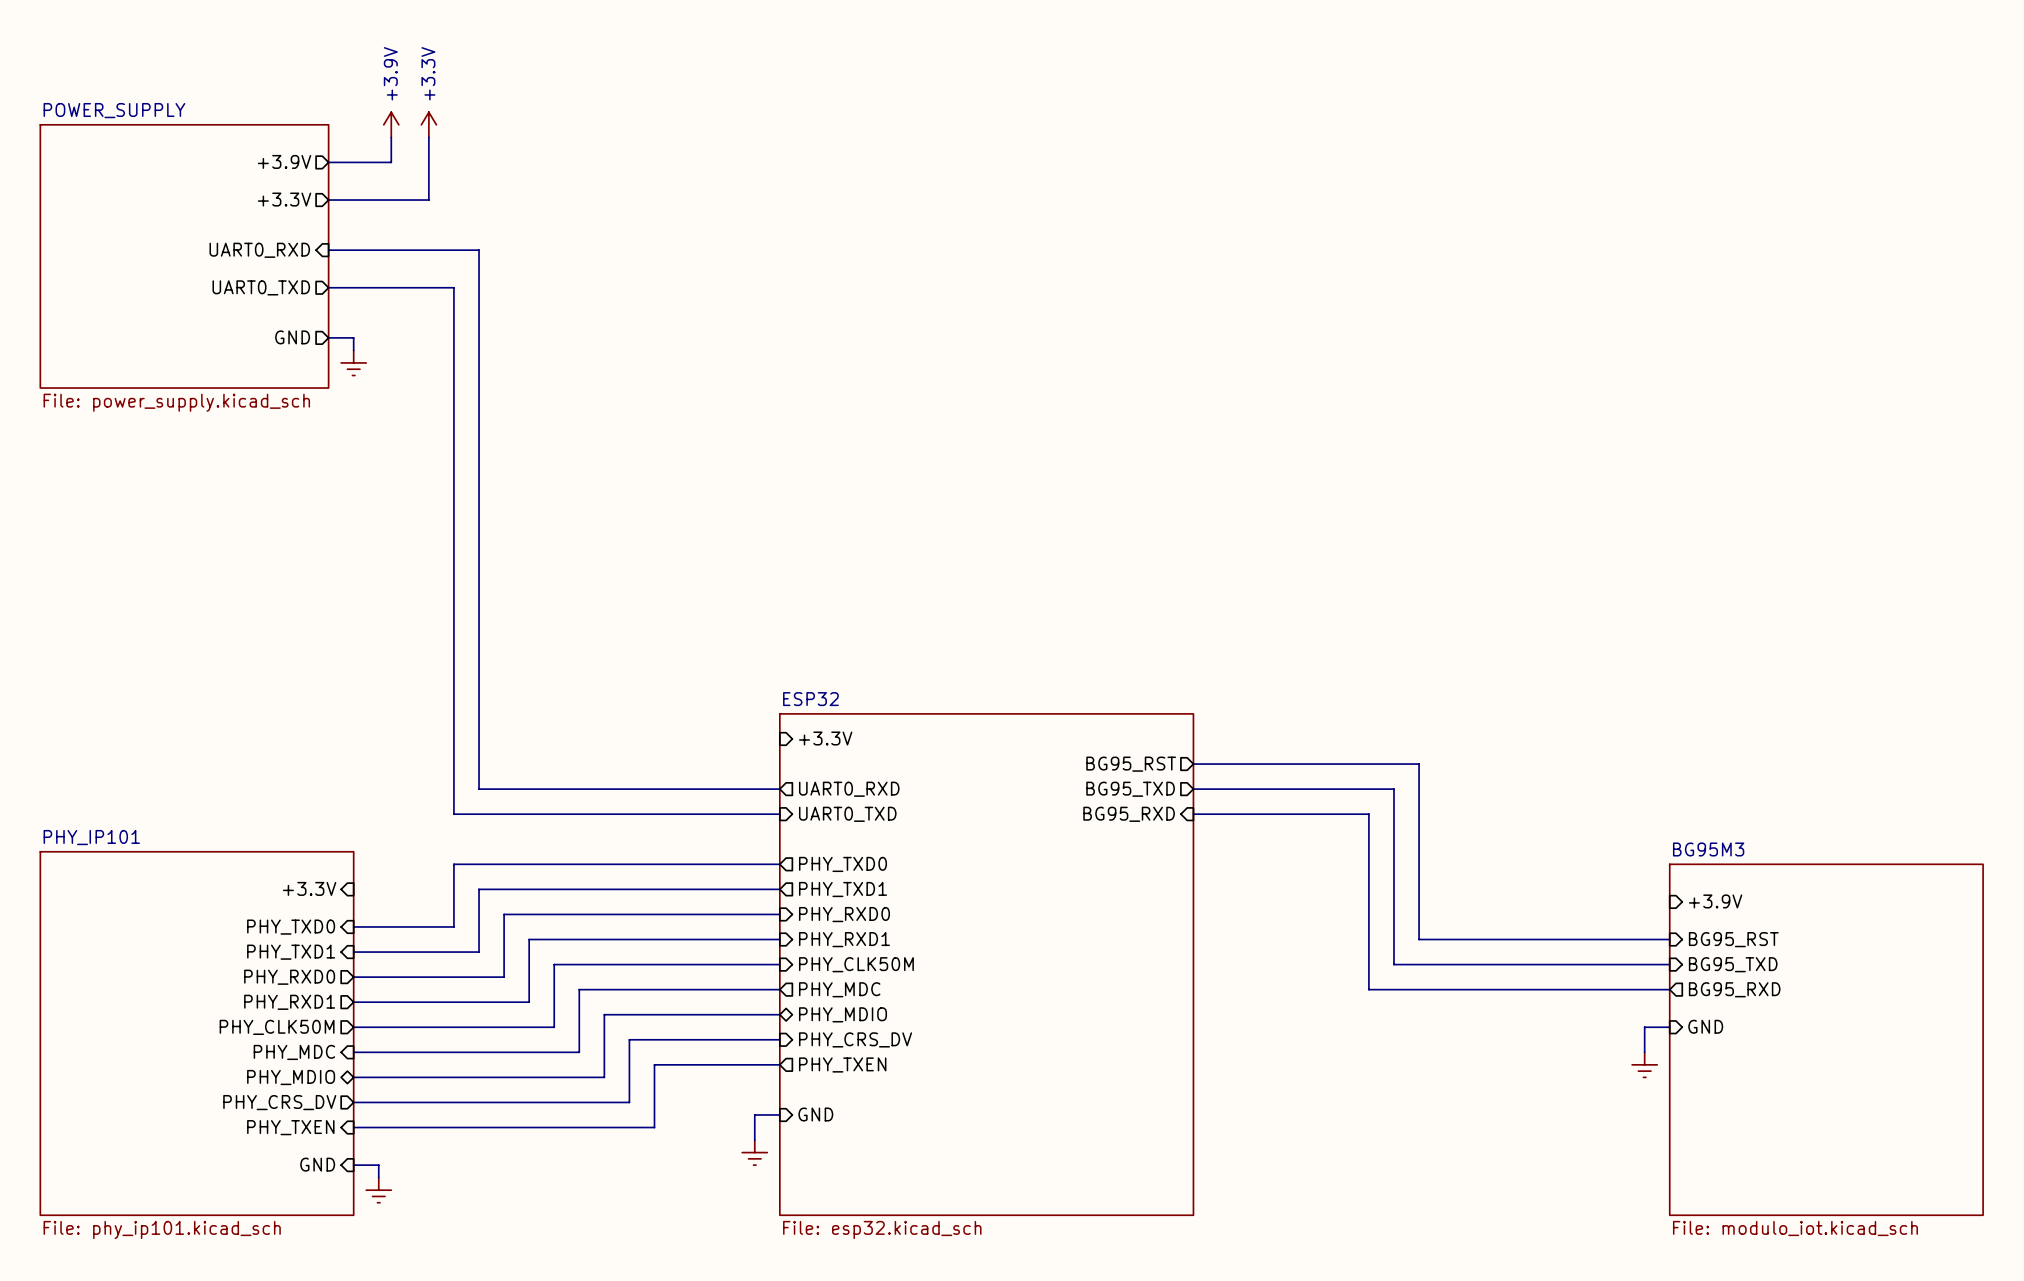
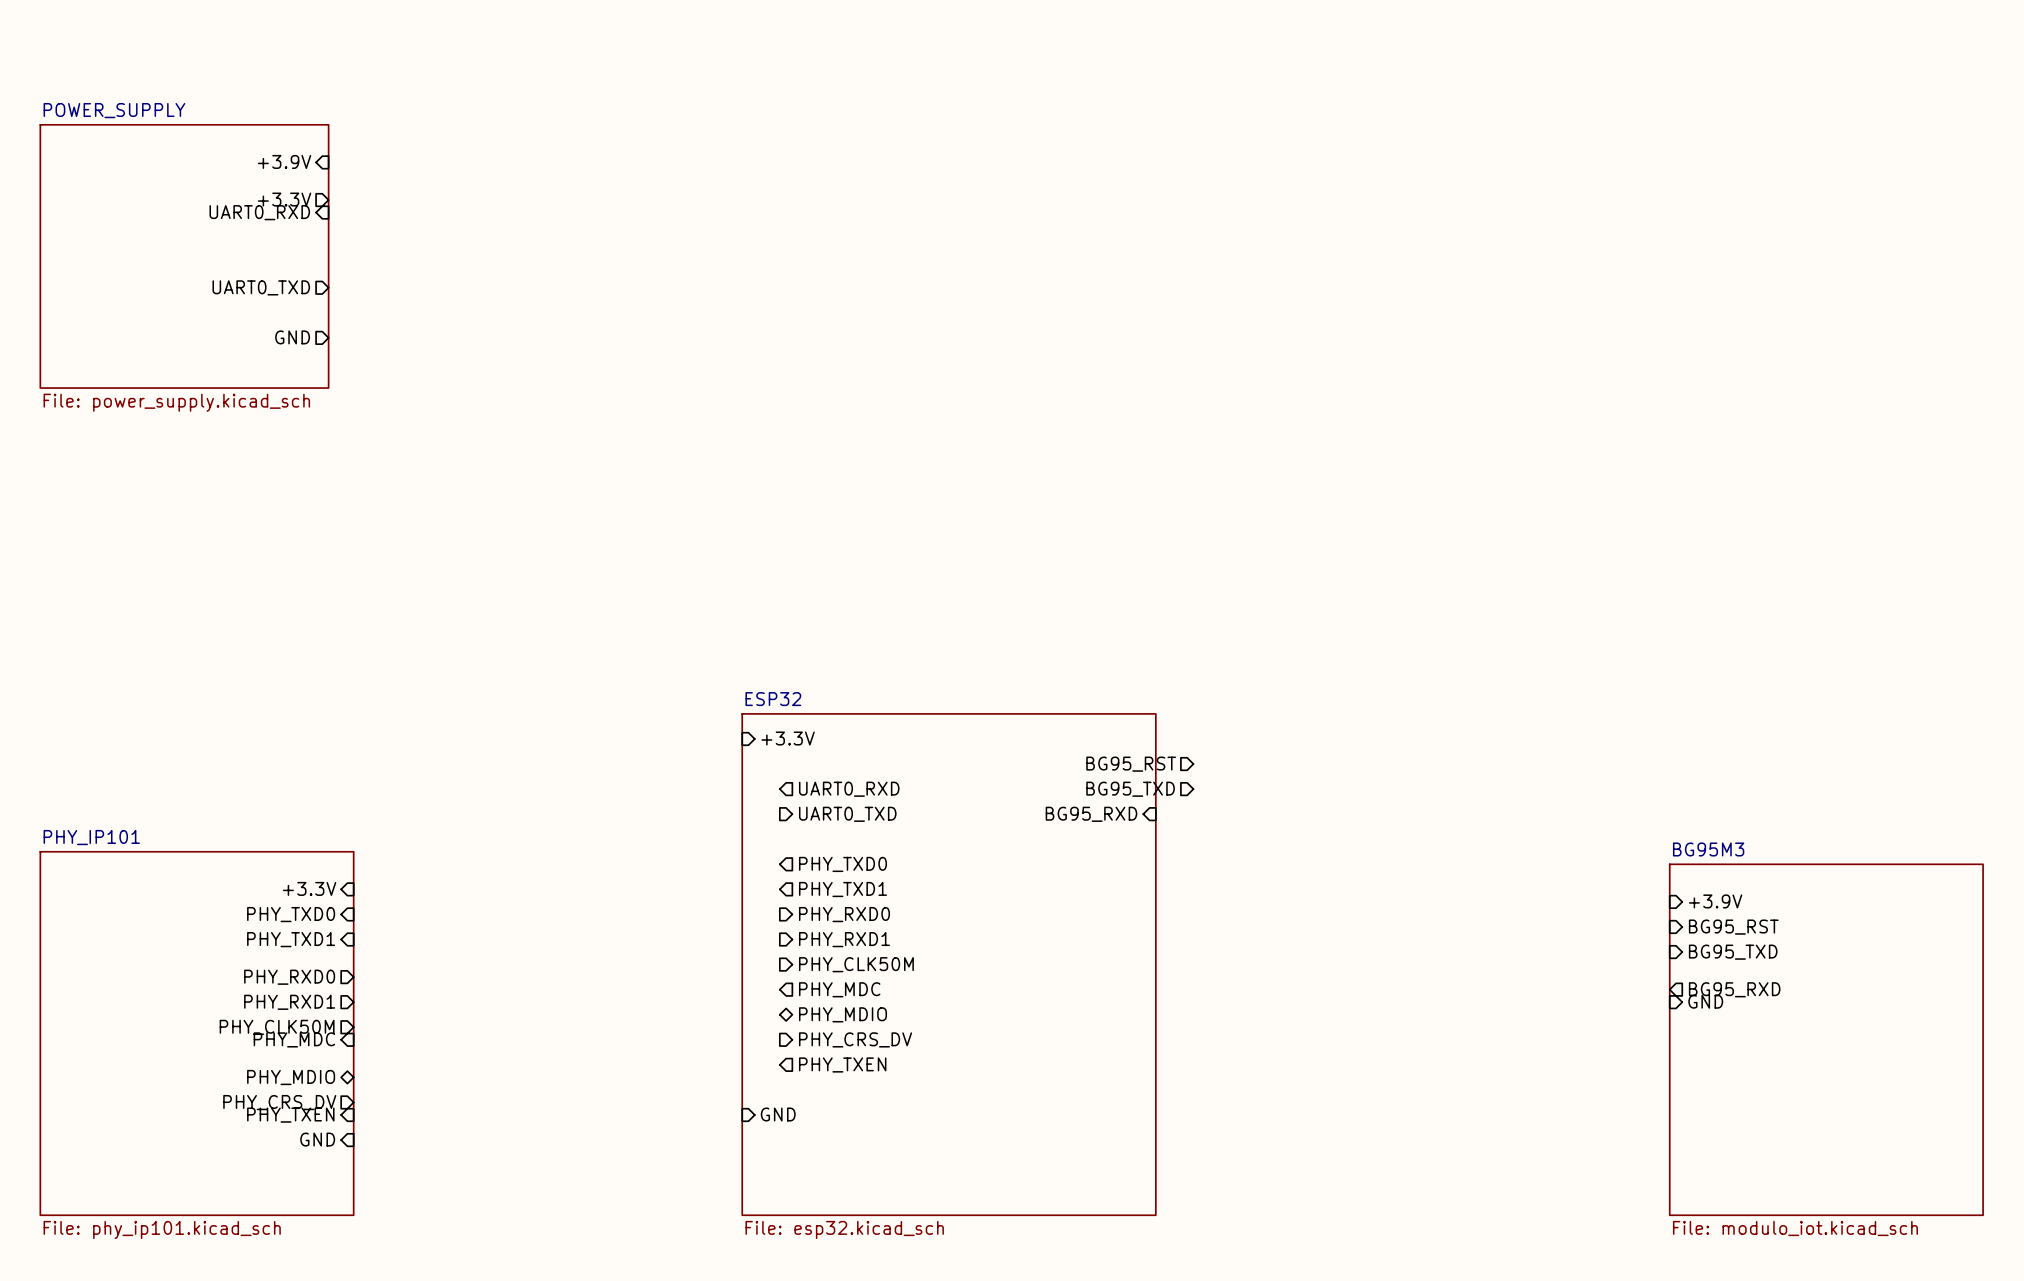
power symbol: +3.9V (391, 124) -> none
power symbol: +3.3V (428, 124) -> none
wire: (391, 137) (391, 162) (328, 162) -> none
wire: (428, 137) (428, 200) (328, 200) -> none
sheet pin shape: output (284, 161) -> input (284, 161)
sheet pin position: UART0_RXD (259, 250) -> UART0_RXD (259, 212)
wire: (328, 250) (479, 250) (479, 789) (779, 789) -> none
wire: (328, 287) (453, 287) (453, 814) (779, 814) -> none
wire: (328, 337) (353, 337) (353, 350) -> none
power symbol: (353, 362) -> none
sheet pin position: +3.3V (825, 738) -> +3.3V (788, 738)
wire: (1193, 764) (1419, 764) (1419, 939) (1669, 939) -> none
wire: (1193, 789) (1393, 789) (1393, 964) (1669, 964) -> none
sheet pin position: BG95_RXD (1129, 814) -> BG95_RXD (1091, 814)
wire: (1193, 814) (1368, 814) (1368, 989) (1669, 989) -> none
wire: (779, 864) (453, 864) (453, 926) (353, 926) -> none
wire: (779, 889) (479, 889) (479, 952) (353, 952) -> none
wire: (779, 914) (504, 914) (504, 977) (353, 977) -> none
sheet pin position: PHY_TXD0 (291, 927) -> PHY_TXD0 (291, 914)
wire: (779, 939) (529, 939) (529, 1002) (353, 1002) -> none
sheet pin position: BG95_RST (1733, 939) -> BG95_RST (1733, 927)
sheet pin position: PHY_TXD1 (291, 952) -> PHY_TXD1 (291, 939)
wire: (779, 964) (554, 964) (554, 1027) (353, 1027) -> none
sheet ESP32 position: (986, 964) -> (949, 964)
sheet pin position: BG95_TXD (1733, 964) -> BG95_TXD (1733, 952)
wire: (779, 989) (579, 989) (579, 1052) (353, 1052) -> none
wire: (779, 1014) (604, 1014) (604, 1077) (353, 1077) -> none
sheet pin position: GND (1705, 1026) -> GND (1705, 1001)
wire: (1669, 1027) (1644, 1027) (1644, 1052) -> none
wire: (779, 1039) (629, 1039) (629, 1102) (353, 1102) -> none
sheet pin position: PHY_MDC (294, 1052) -> PHY_MDC (294, 1039)
wire: (779, 1064) (654, 1064) (654, 1127) (353, 1127) -> none
power symbol: (1644, 1064) -> none
wire: (779, 1114) (754, 1114) (754, 1140) -> none
sheet pin position: GND (815, 1114) -> GND (778, 1114)
sheet pin position: PHY_TXEN (290, 1127) -> PHY_TXEN (290, 1115)
power symbol: (754, 1152) -> none
sheet pin position: GND (317, 1164) -> GND (317, 1139)
wire: (353, 1165) (378, 1165) (378, 1177) -> none
power symbol: (378, 1190) -> none

